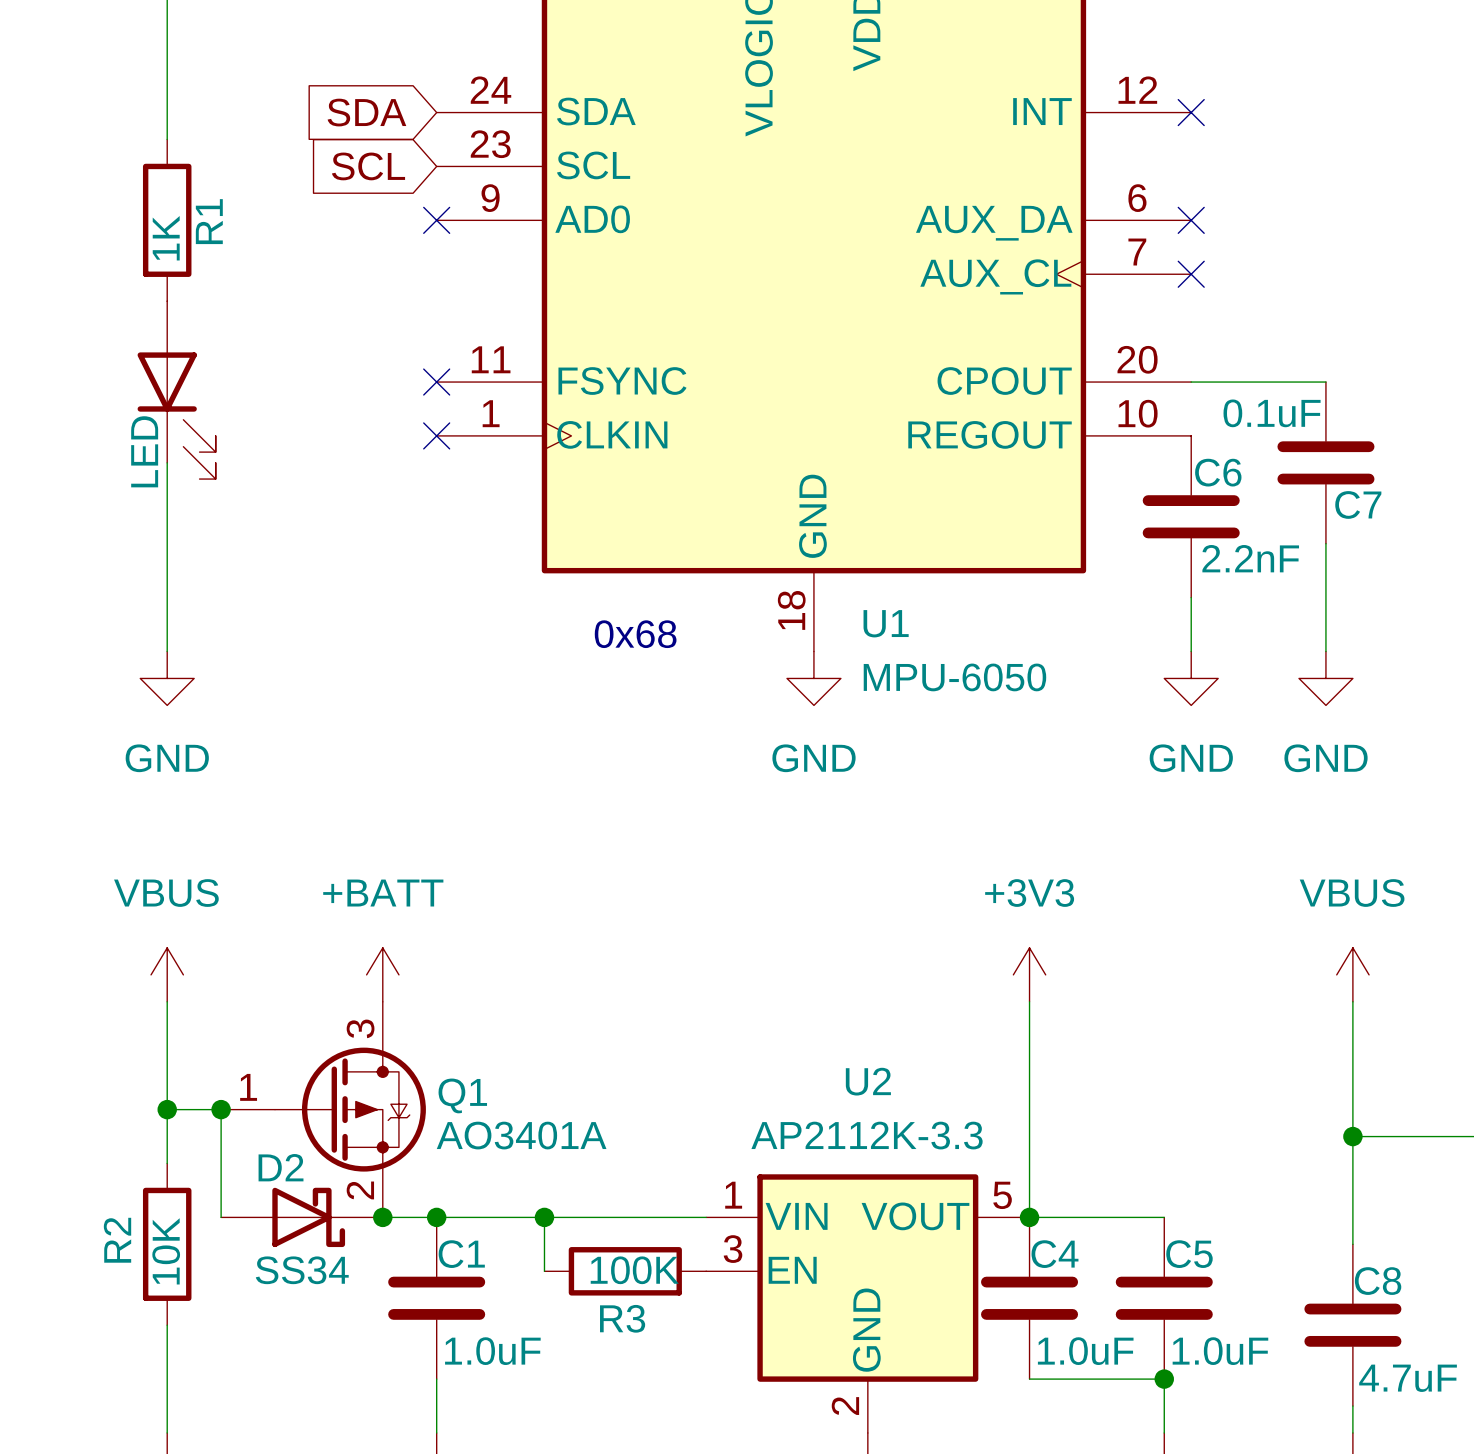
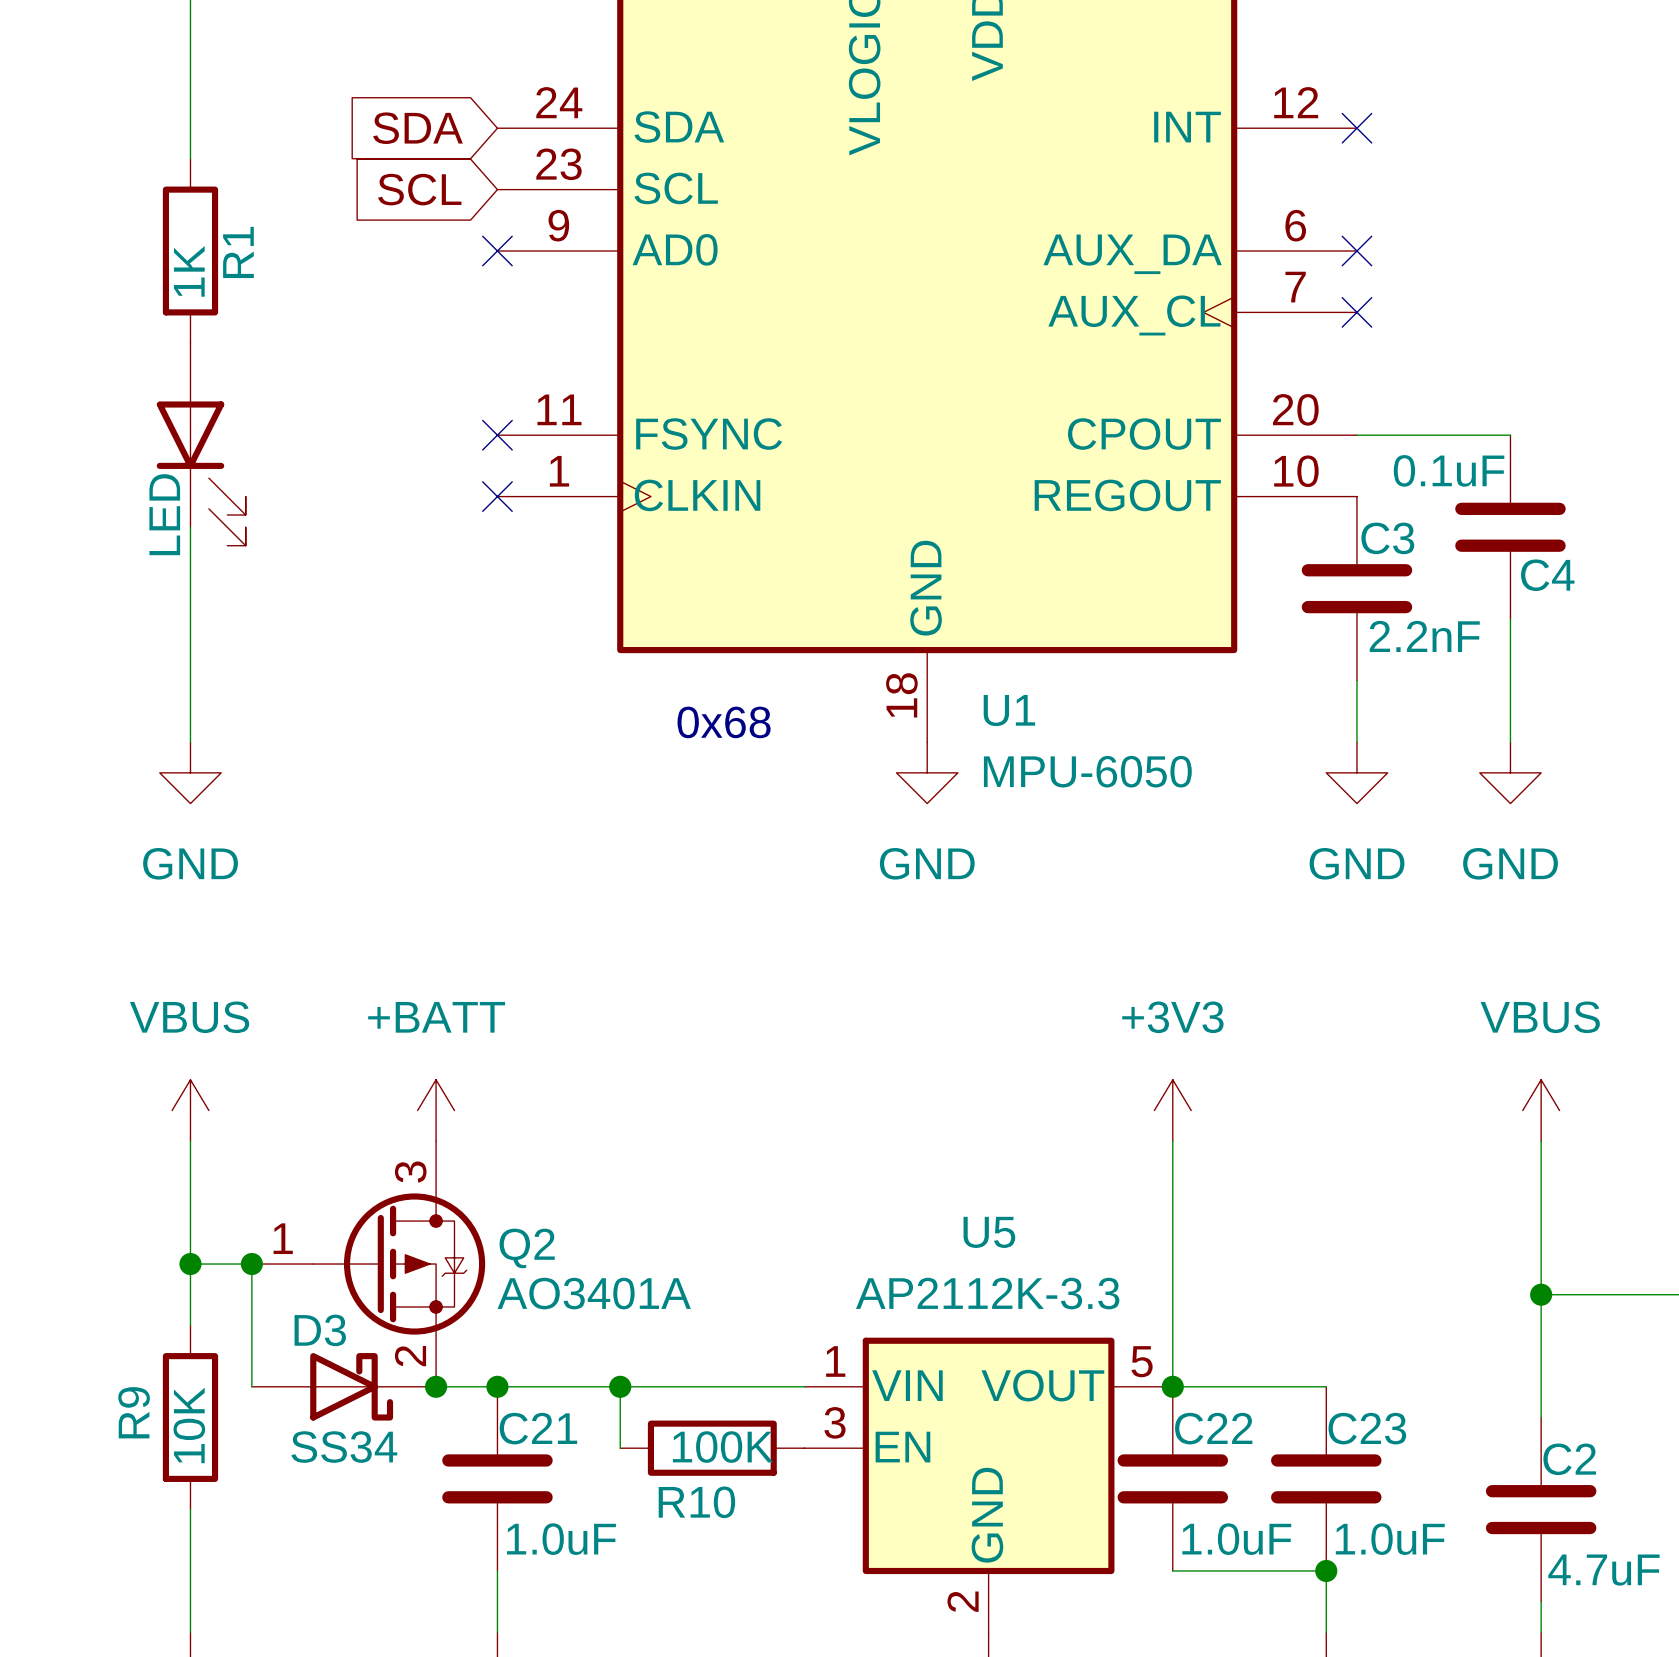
C6 name: C6 (1218, 472) -> C3 (1387, 538)
C7 name: C7 (1358, 504) -> C4 (1547, 575)
U2 name: U2 (868, 1081) -> U5 (989, 1232)
Q1 name: Q1 (462, 1095) -> Q2 (527, 1248)
D2 name: D2 (281, 1167) -> D3 (320, 1330)
R2 name: R2 (117, 1240) -> R9 (134, 1412)
C1 name: C1 (461, 1254) -> C21 (538, 1428)
C4 name: C4 (1054, 1254) -> C22 (1213, 1428)
C5 name: C5 (1189, 1254) -> C23 (1367, 1428)
C8 name: C8 (1378, 1281) -> C2 (1569, 1459)
R3 name: R3 (622, 1318) -> R10 (696, 1502)

